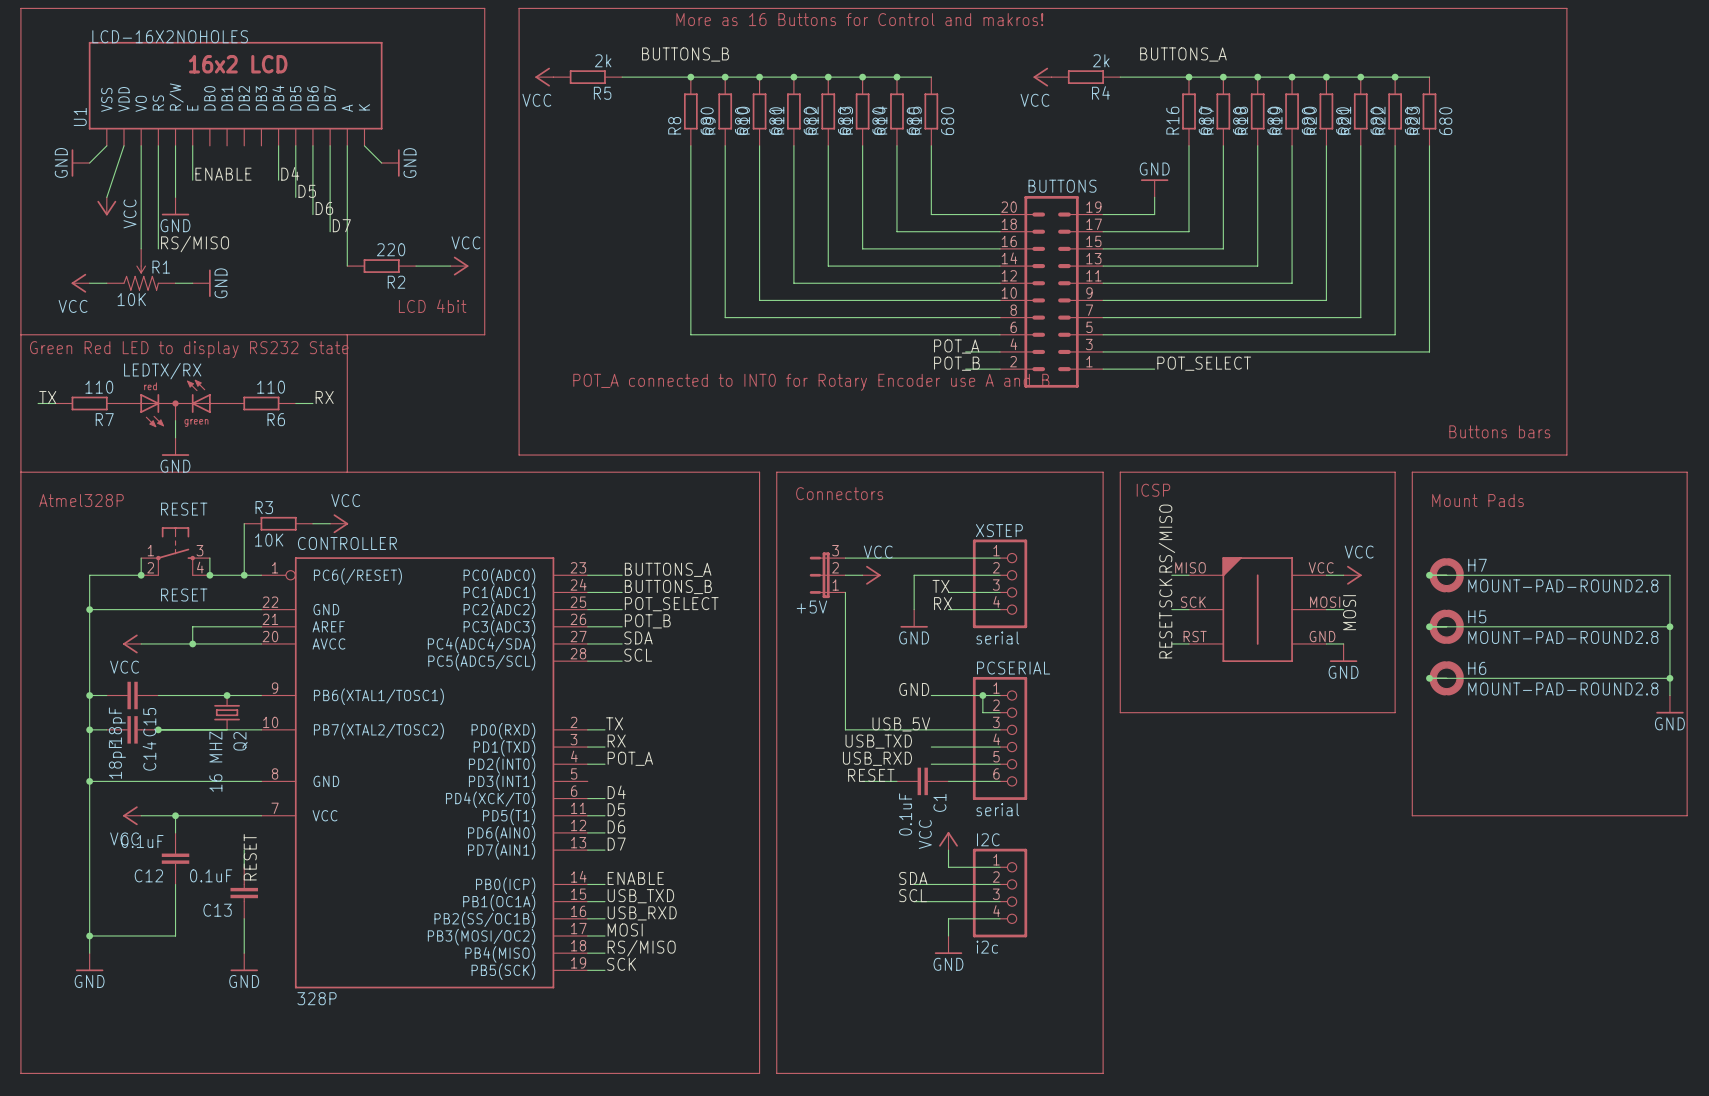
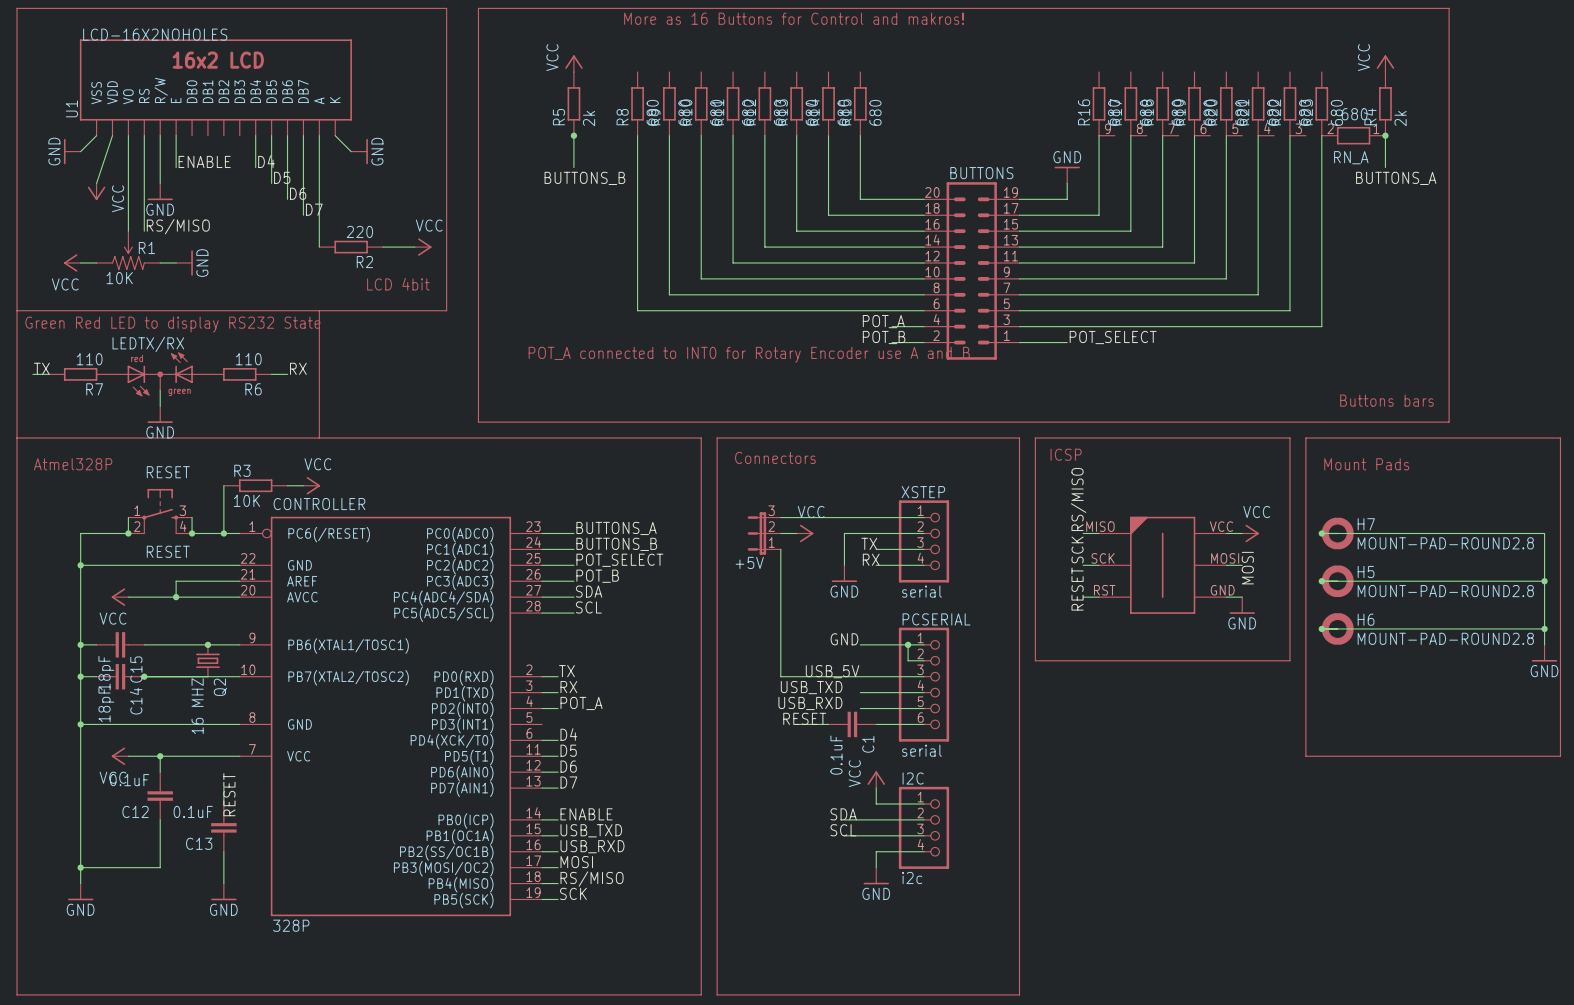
label position: BUTTONS_B (685, 54) -> BUTTONS_B (584, 178)
label: BUTTONS_A (1183, 54) -> none
power symbol: none -> VCC (1385, 63)
power symbol rotation: 0° (542, 77) -> 90° clockwise (573, 62)
power symbol position: VCC (544, 77) -> VCC (573, 63)
R5 rotation: 0° (587, 77) -> 90° clockwise (573, 103)
R5 position: (587, 77) -> (573, 103)
wire: (622, 77) (931, 77) -> none
junction: (690, 77) -> none
junction: (725, 77) -> none
junction: (759, 77) -> none
junction: (793, 77) -> none
junction: (828, 77) -> none
junction: (862, 77) -> none
junction: (896, 77) -> none
power symbol: VCC (1042, 77) -> none
R4 rotation: 0° (1085, 77) -> 90° clockwise (1385, 103)
R4 position: (1085, 77) -> (1385, 103)
wire: (1120, 77) (1429, 77) -> none
junction: (1188, 77) -> none
junction: (1223, 77) -> none
junction: (1257, 77) -> none
junction: (1292, 77) -> none
junction: (1326, 77) -> none
junction: (1360, 77) -> none
junction: (1395, 77) -> none
wire: none -> (573, 135) (573, 167)
junction: none -> (573, 135)
RN_A: none -> 680 (1242, 135)
wire: none -> (1385, 135) (1385, 167)
junction: none -> (1385, 135)
label: none -> BUTTONS_A (1396, 178)

